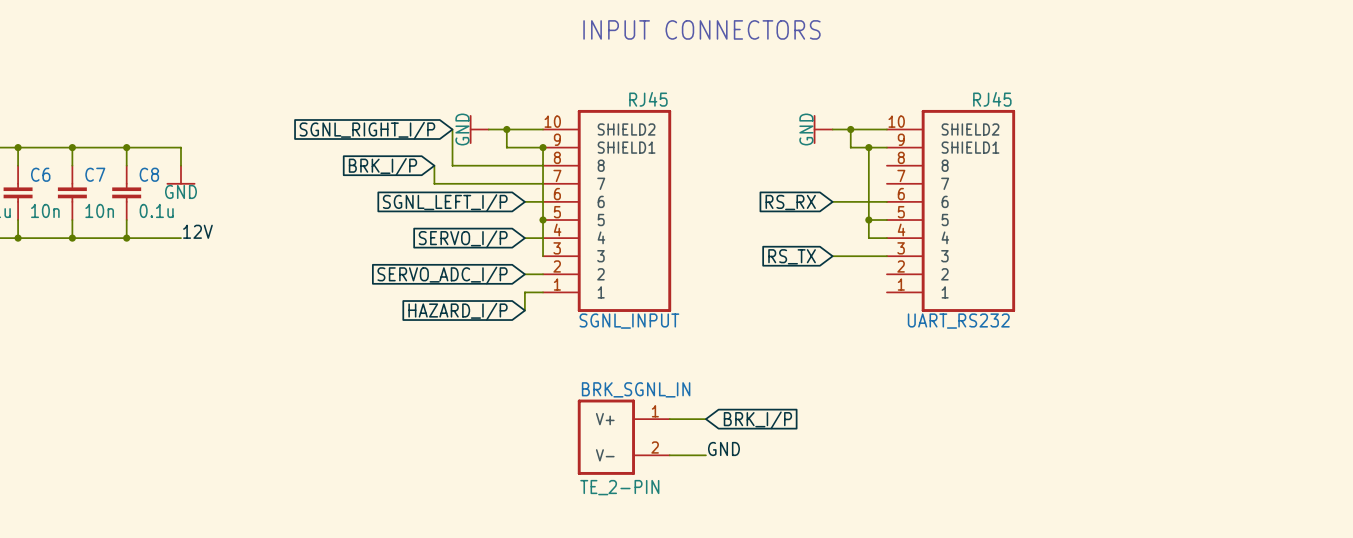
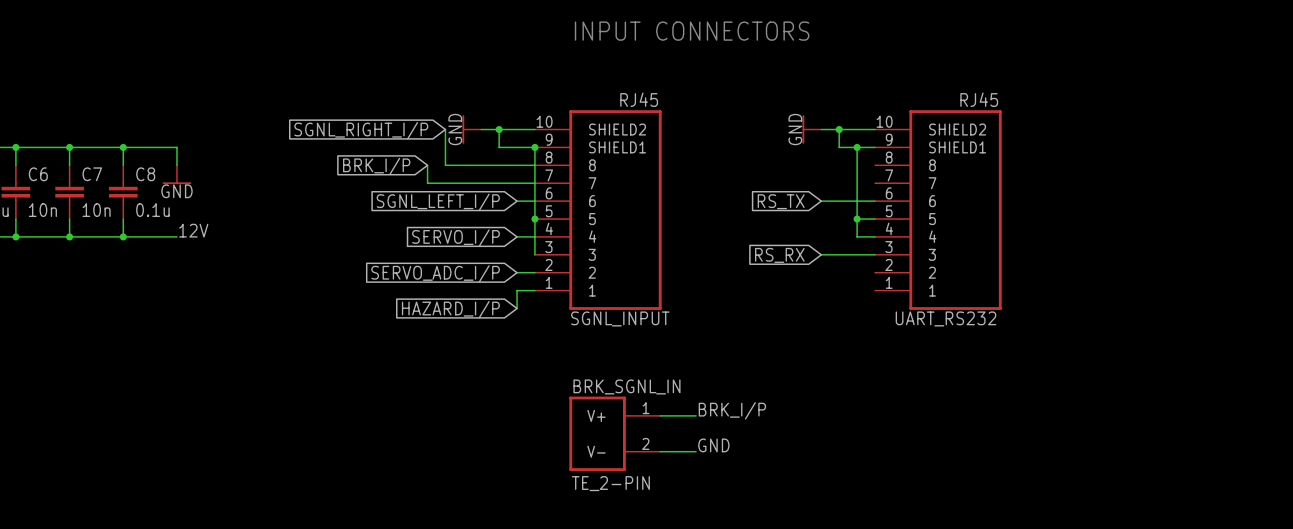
global label: RS_RX (790, 202) -> RS_TX (781, 201)
global label: RS_TX (792, 256) -> RS_RX (779, 255)
label: none -> BRK_I/P (732, 410)
global label: BRK_I/P (757, 420) -> none

